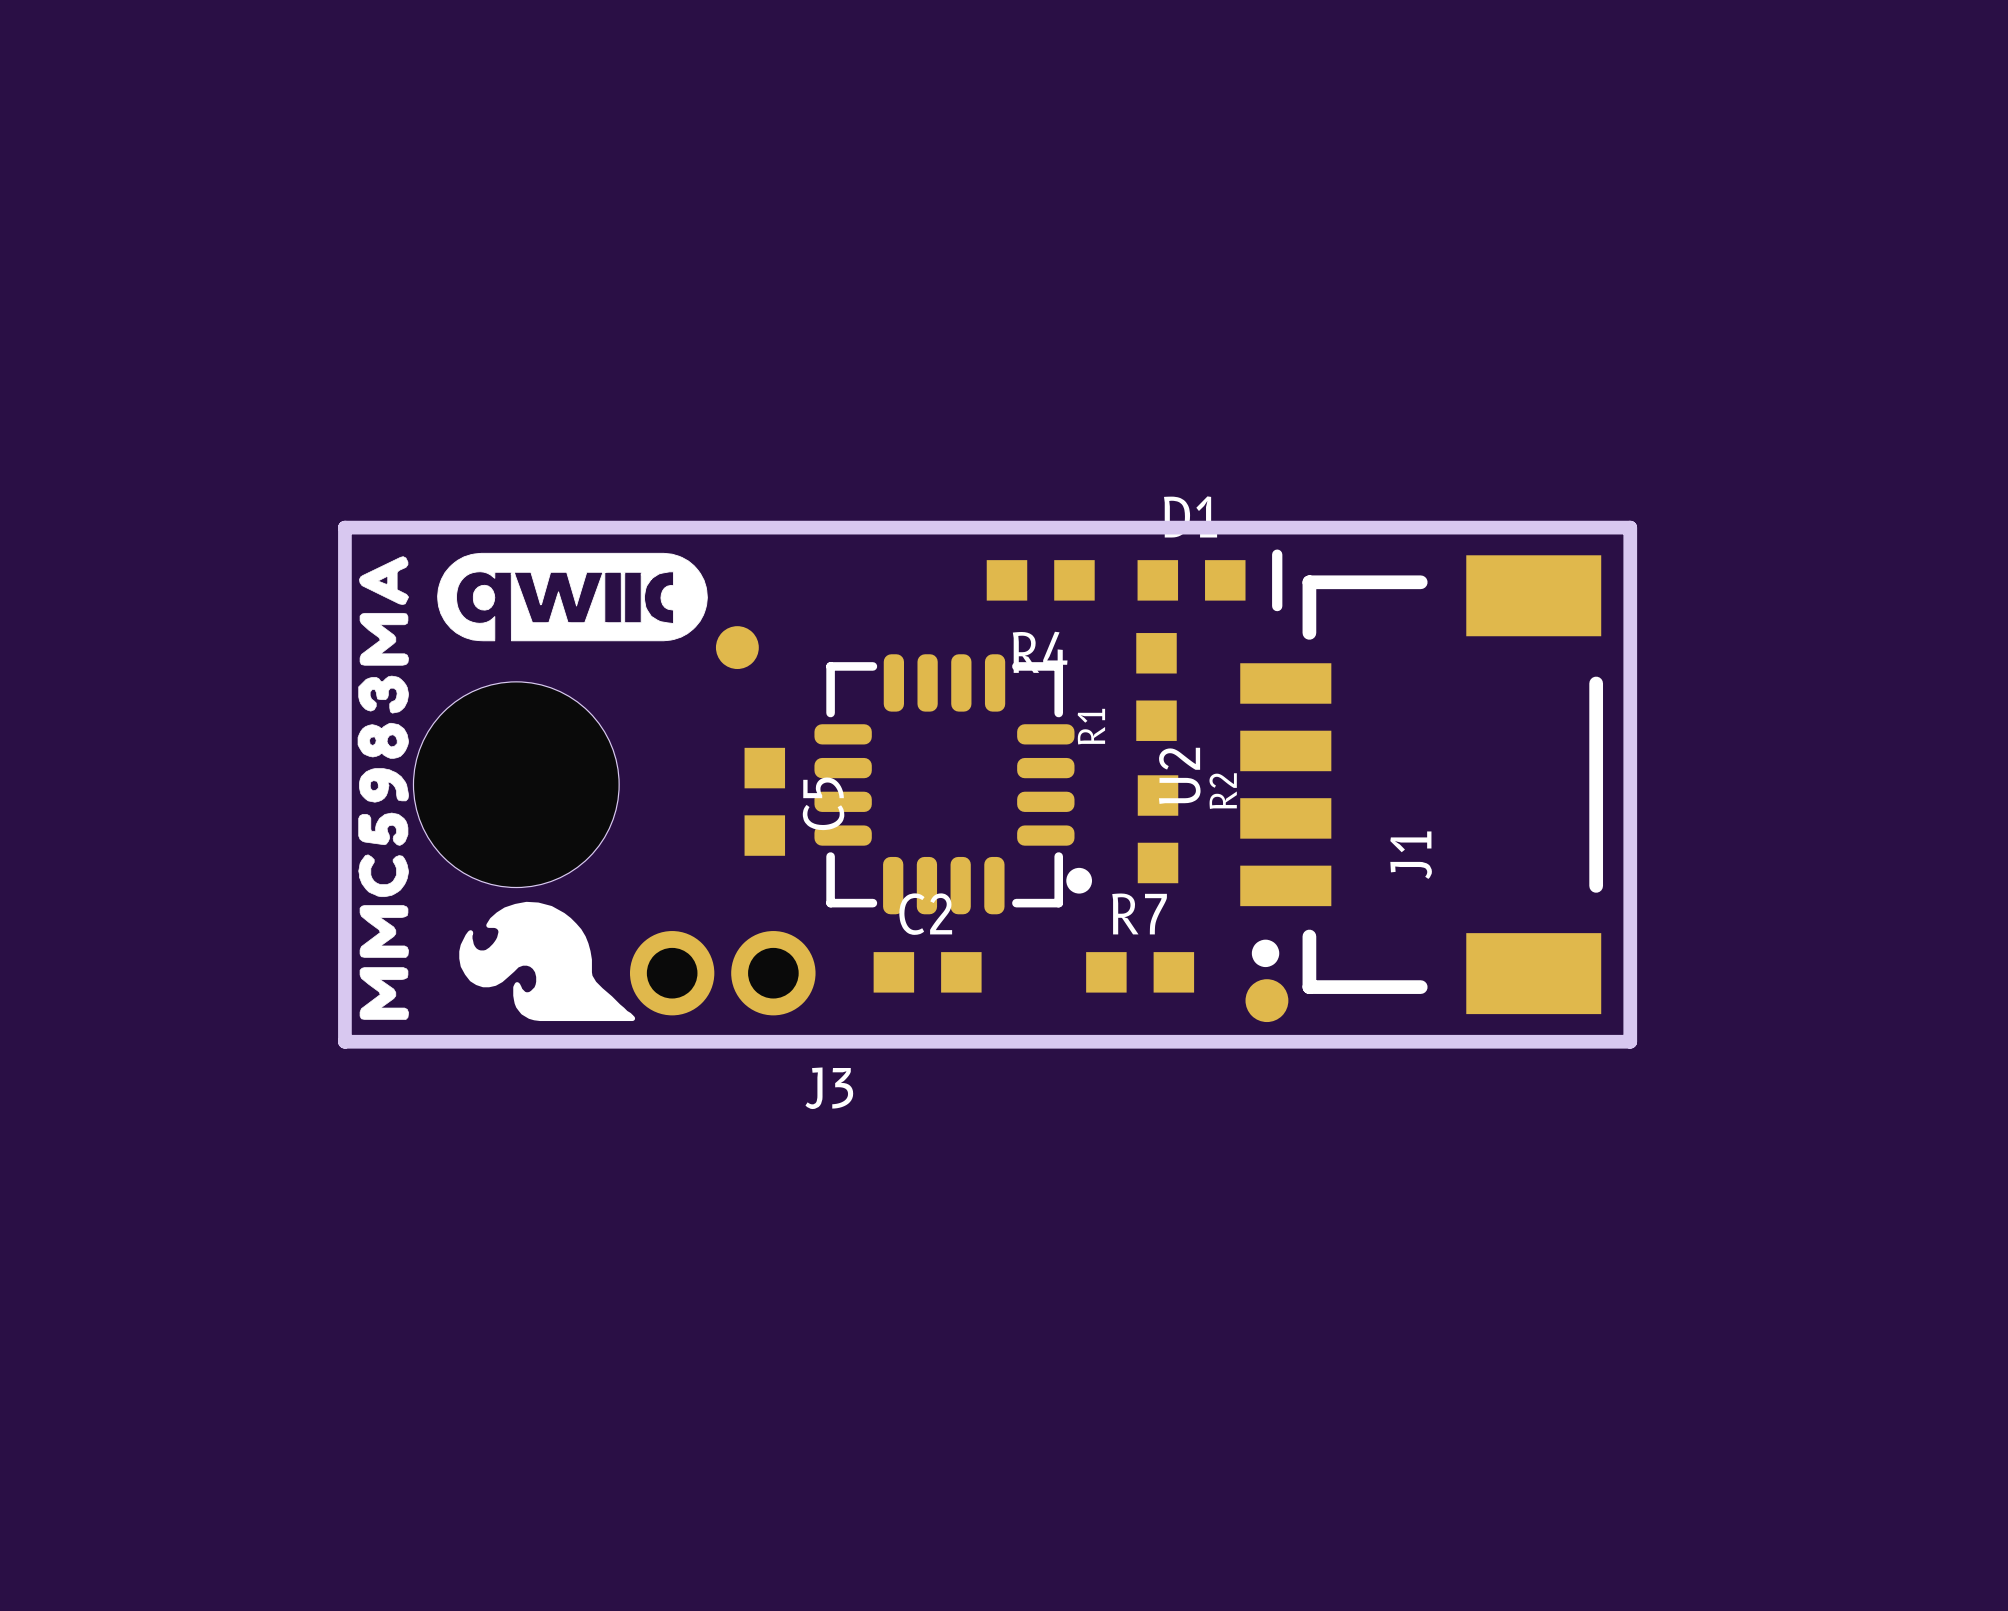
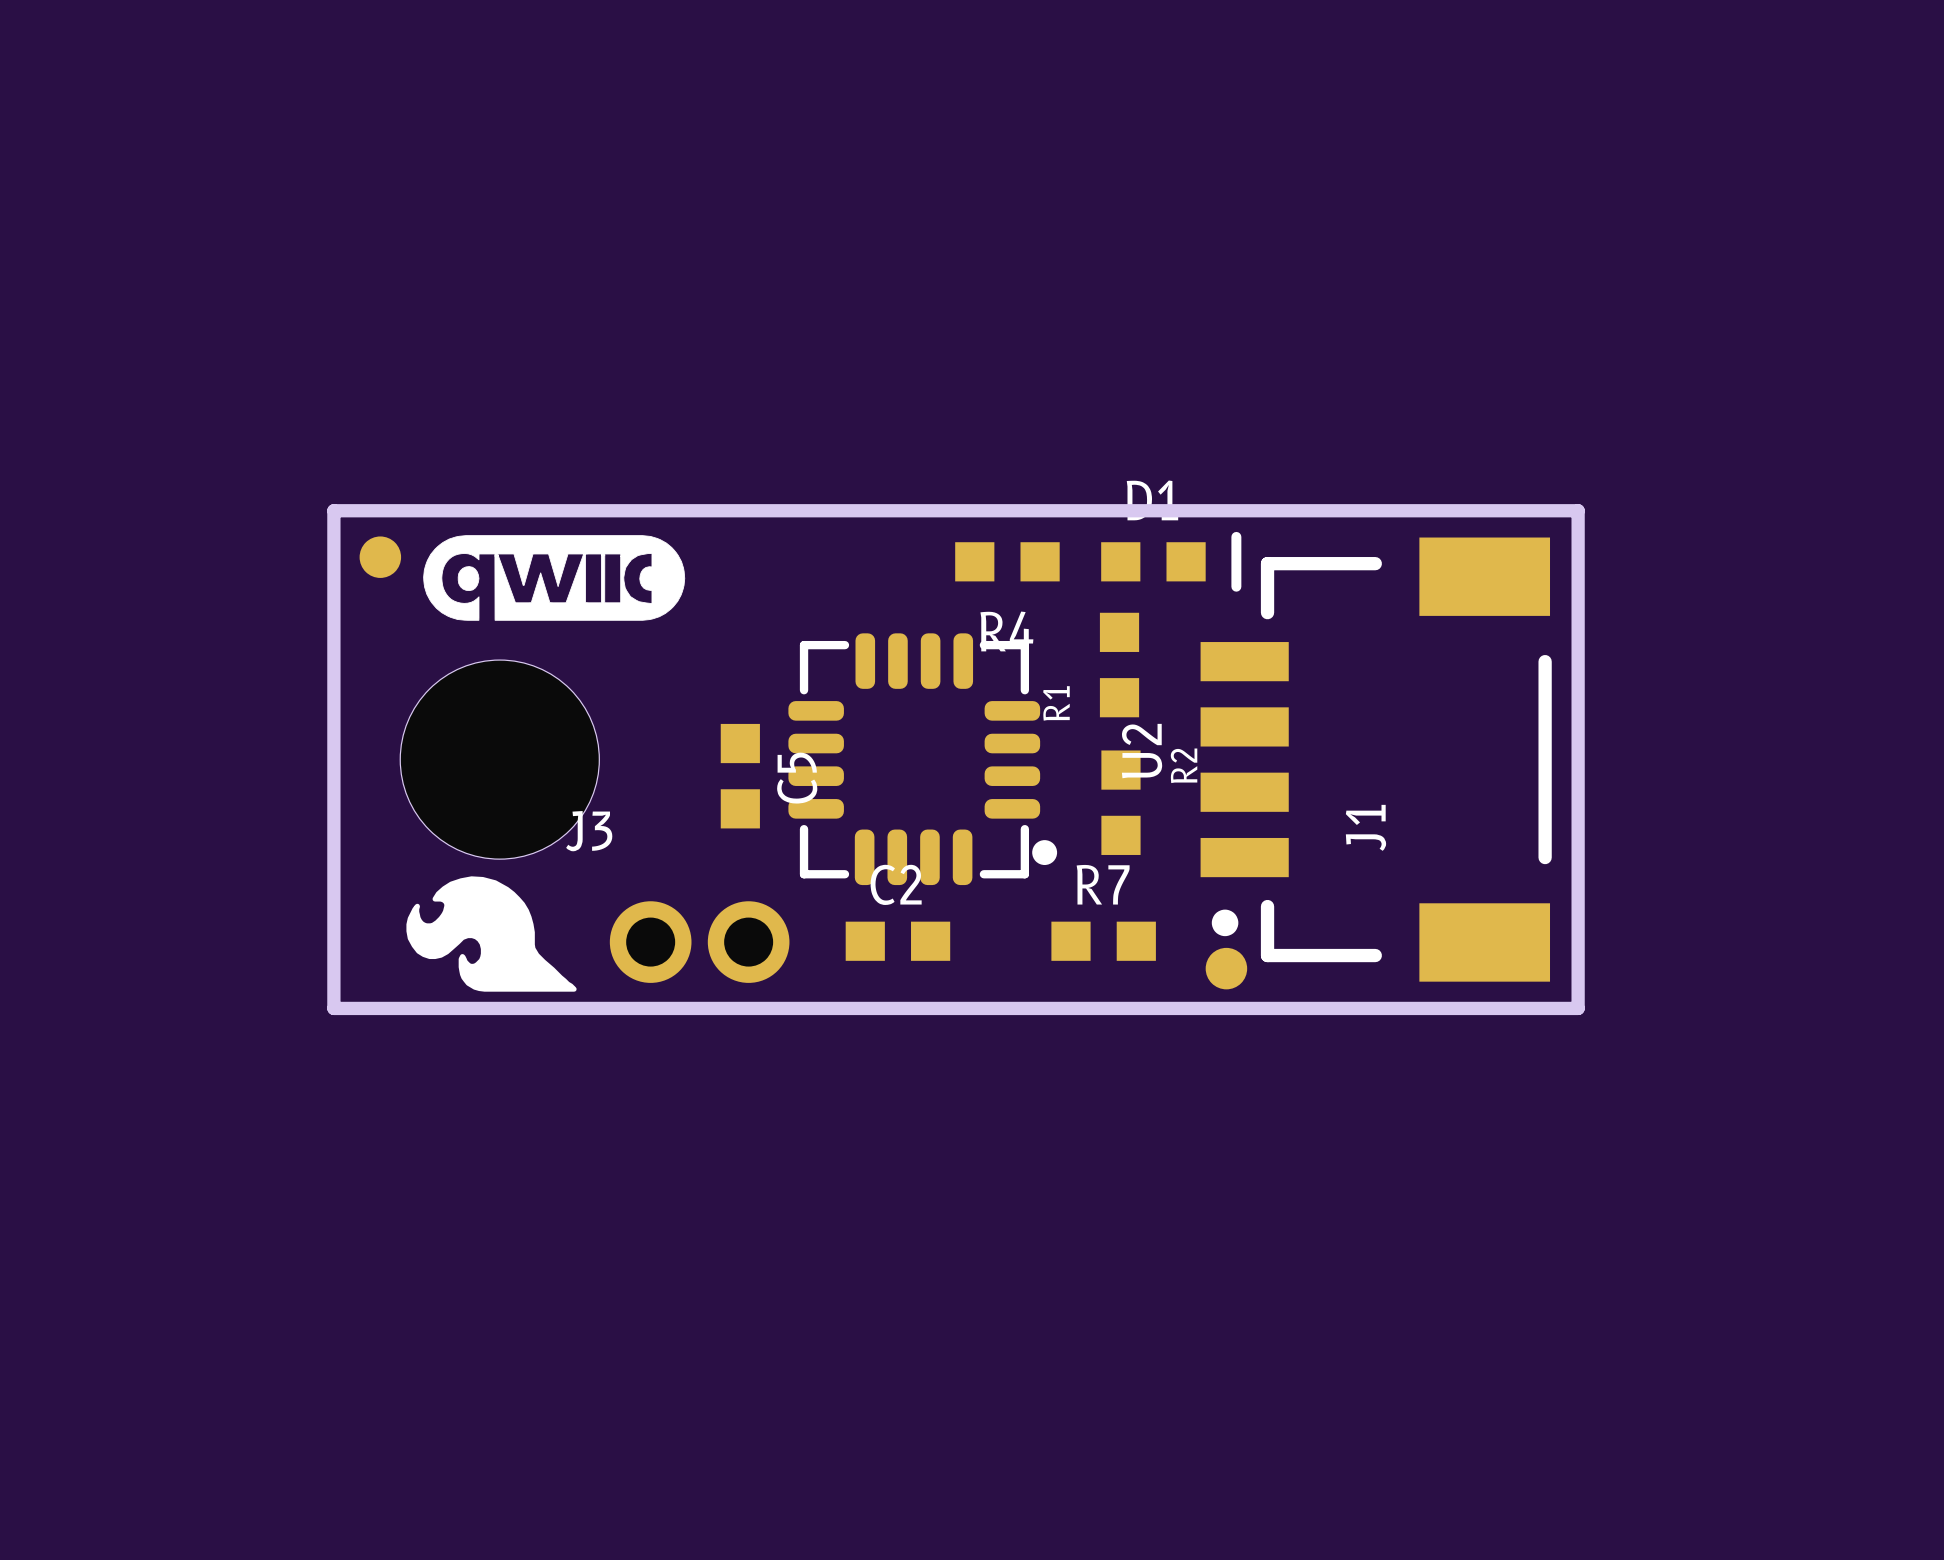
drawing: [357, 556, 409, 1020] -> none
part position: (737, 647) -> (380, 557)
drawing position: (547, 961) -> (491, 934)
J3 name position: J3 (829, 1088) -> J3 (589, 831)

